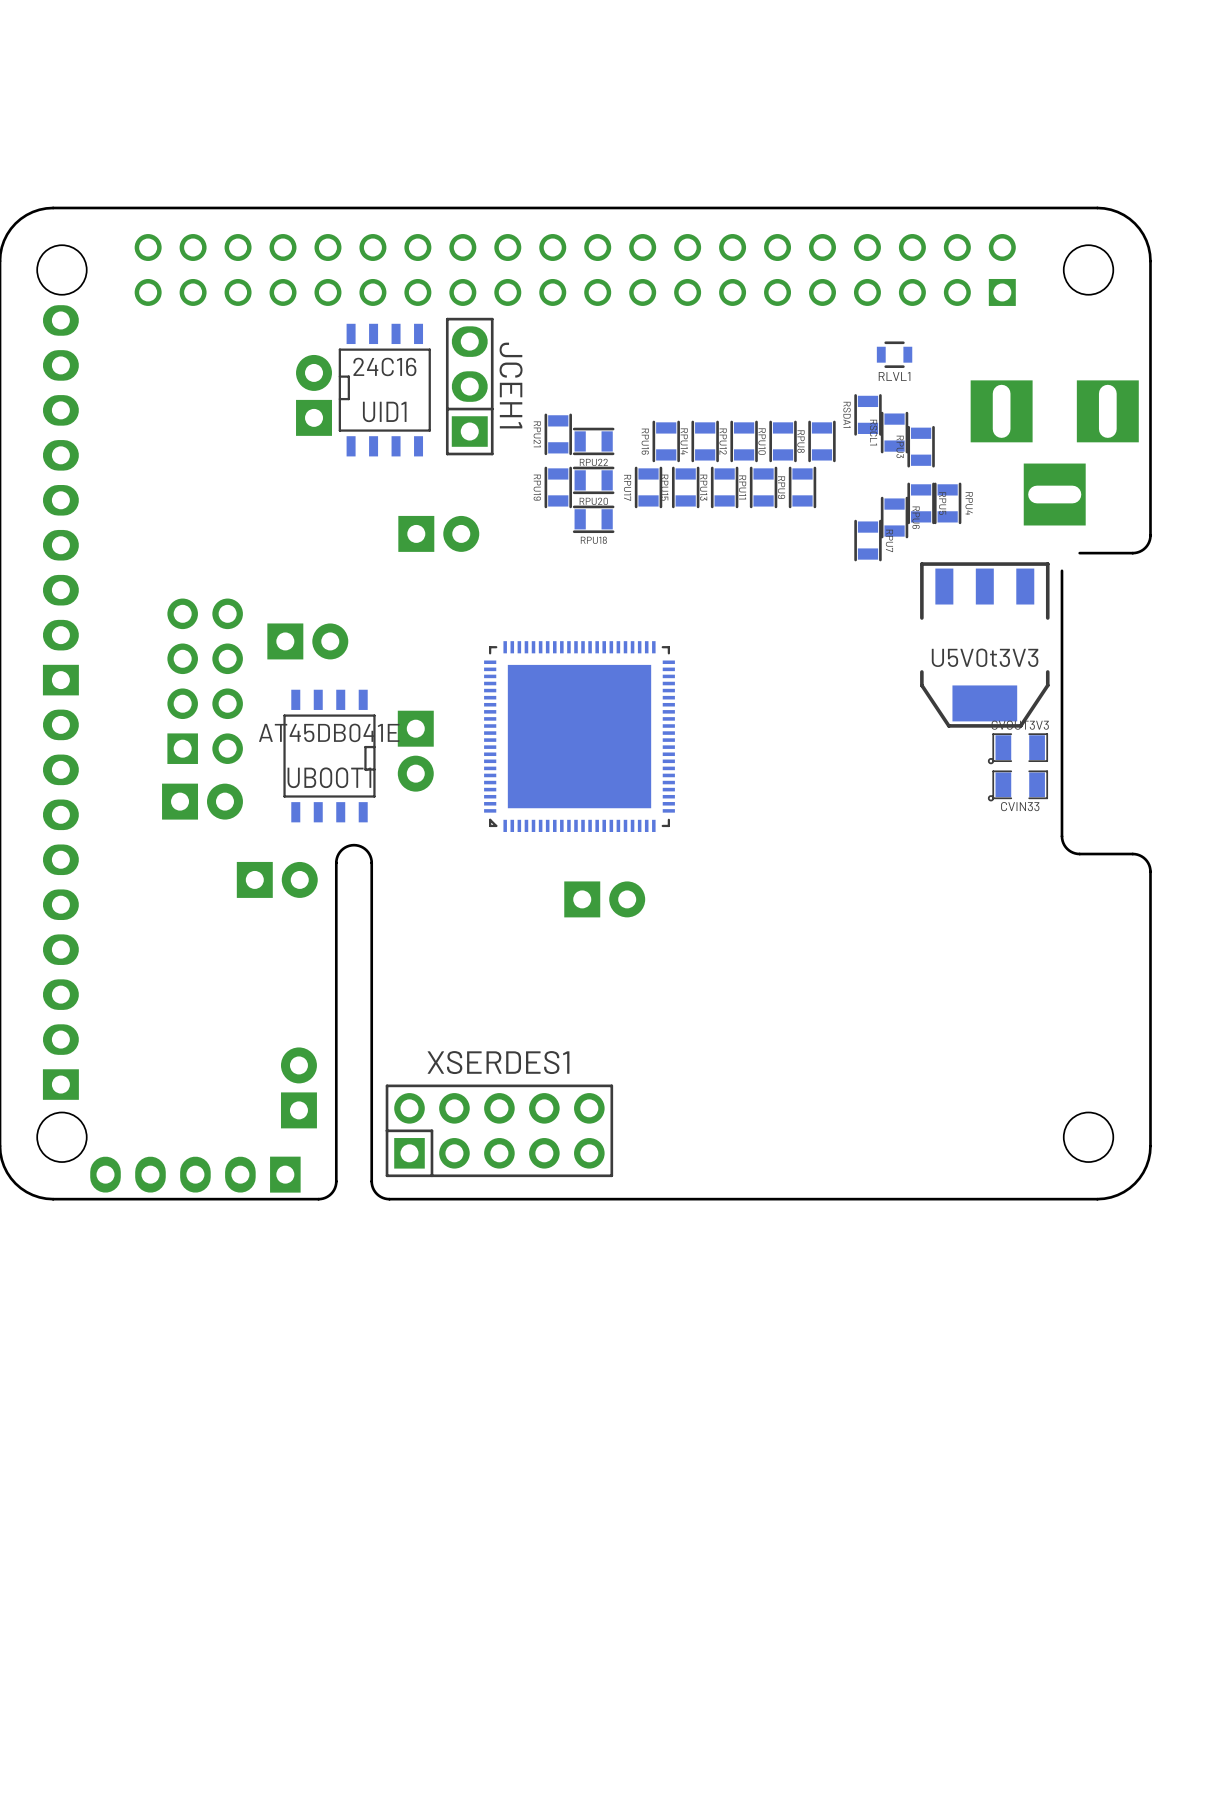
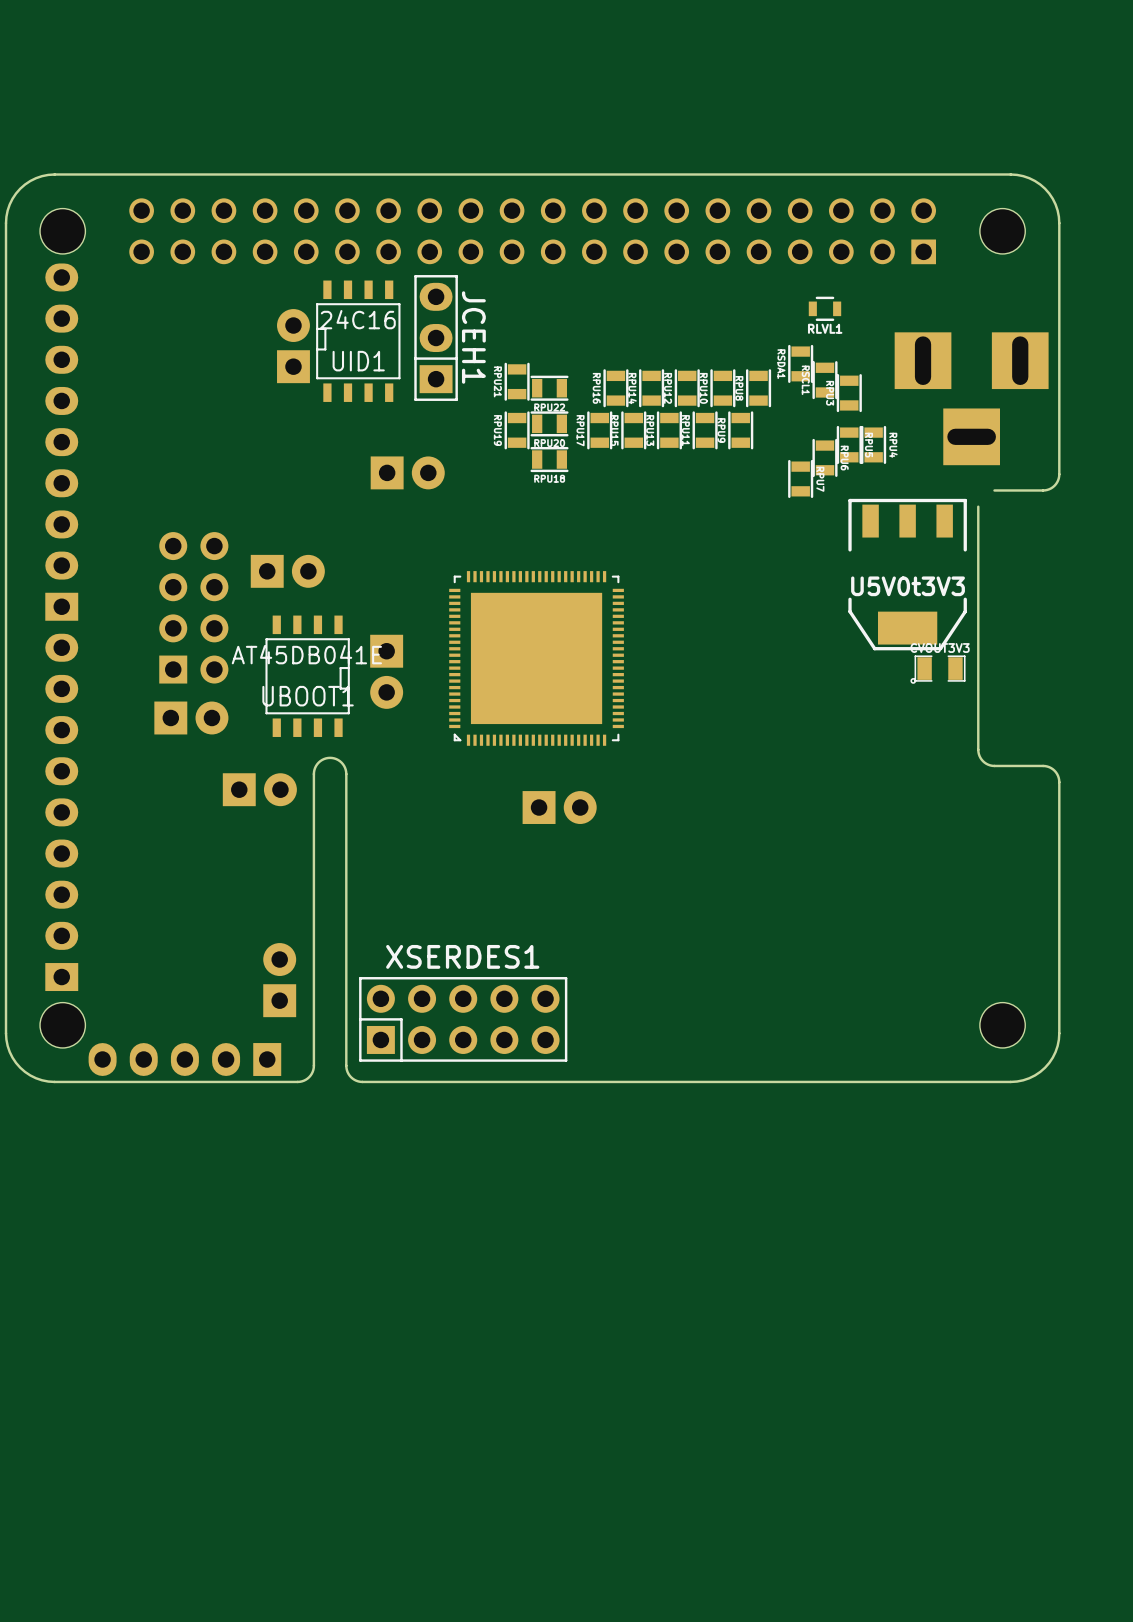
CVIN33: (1017, 785) -> none

